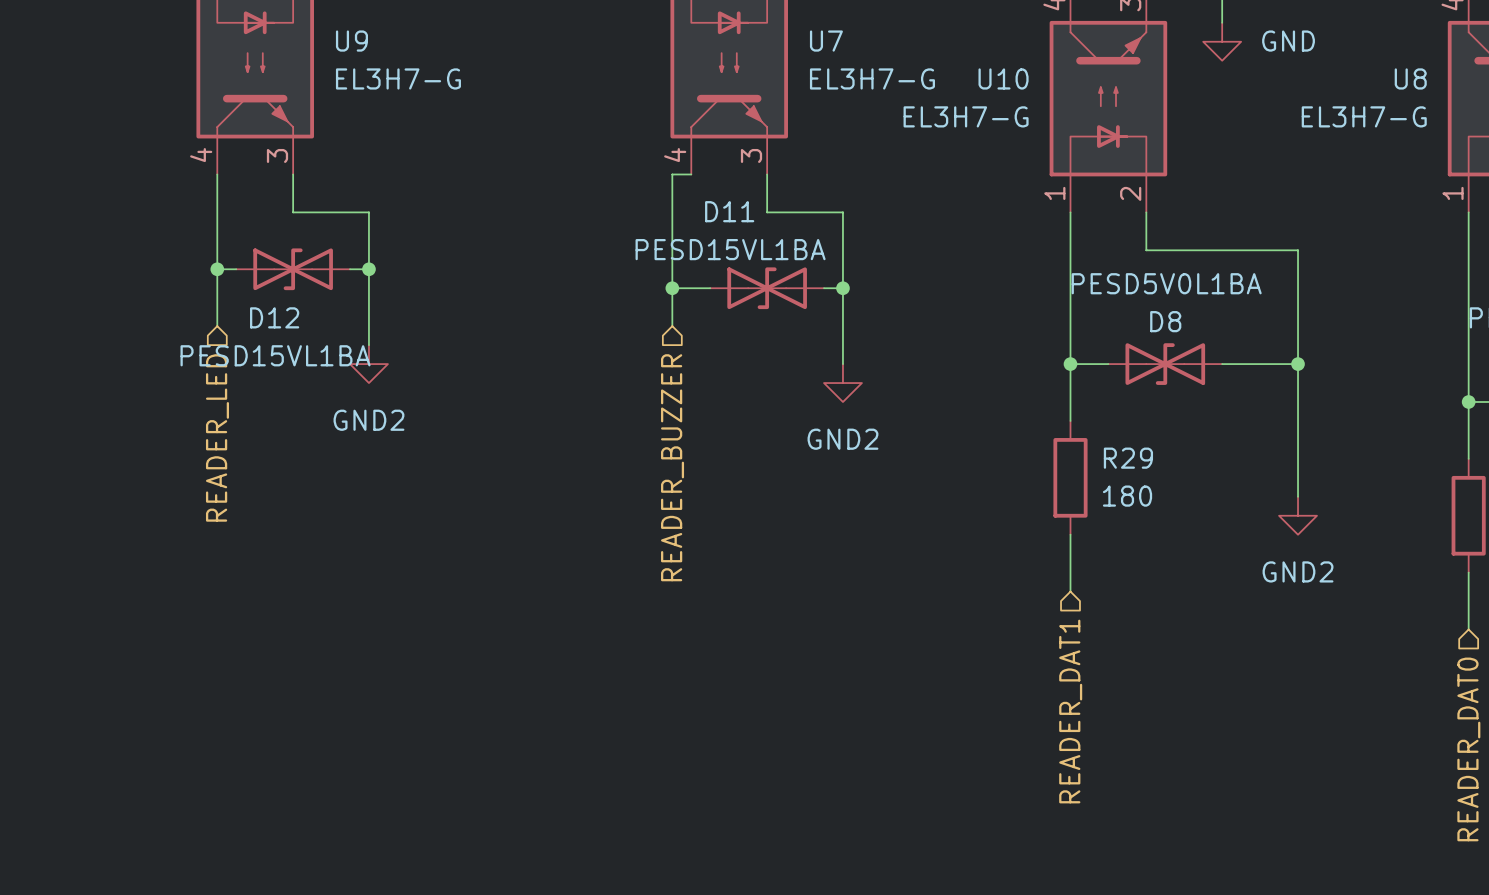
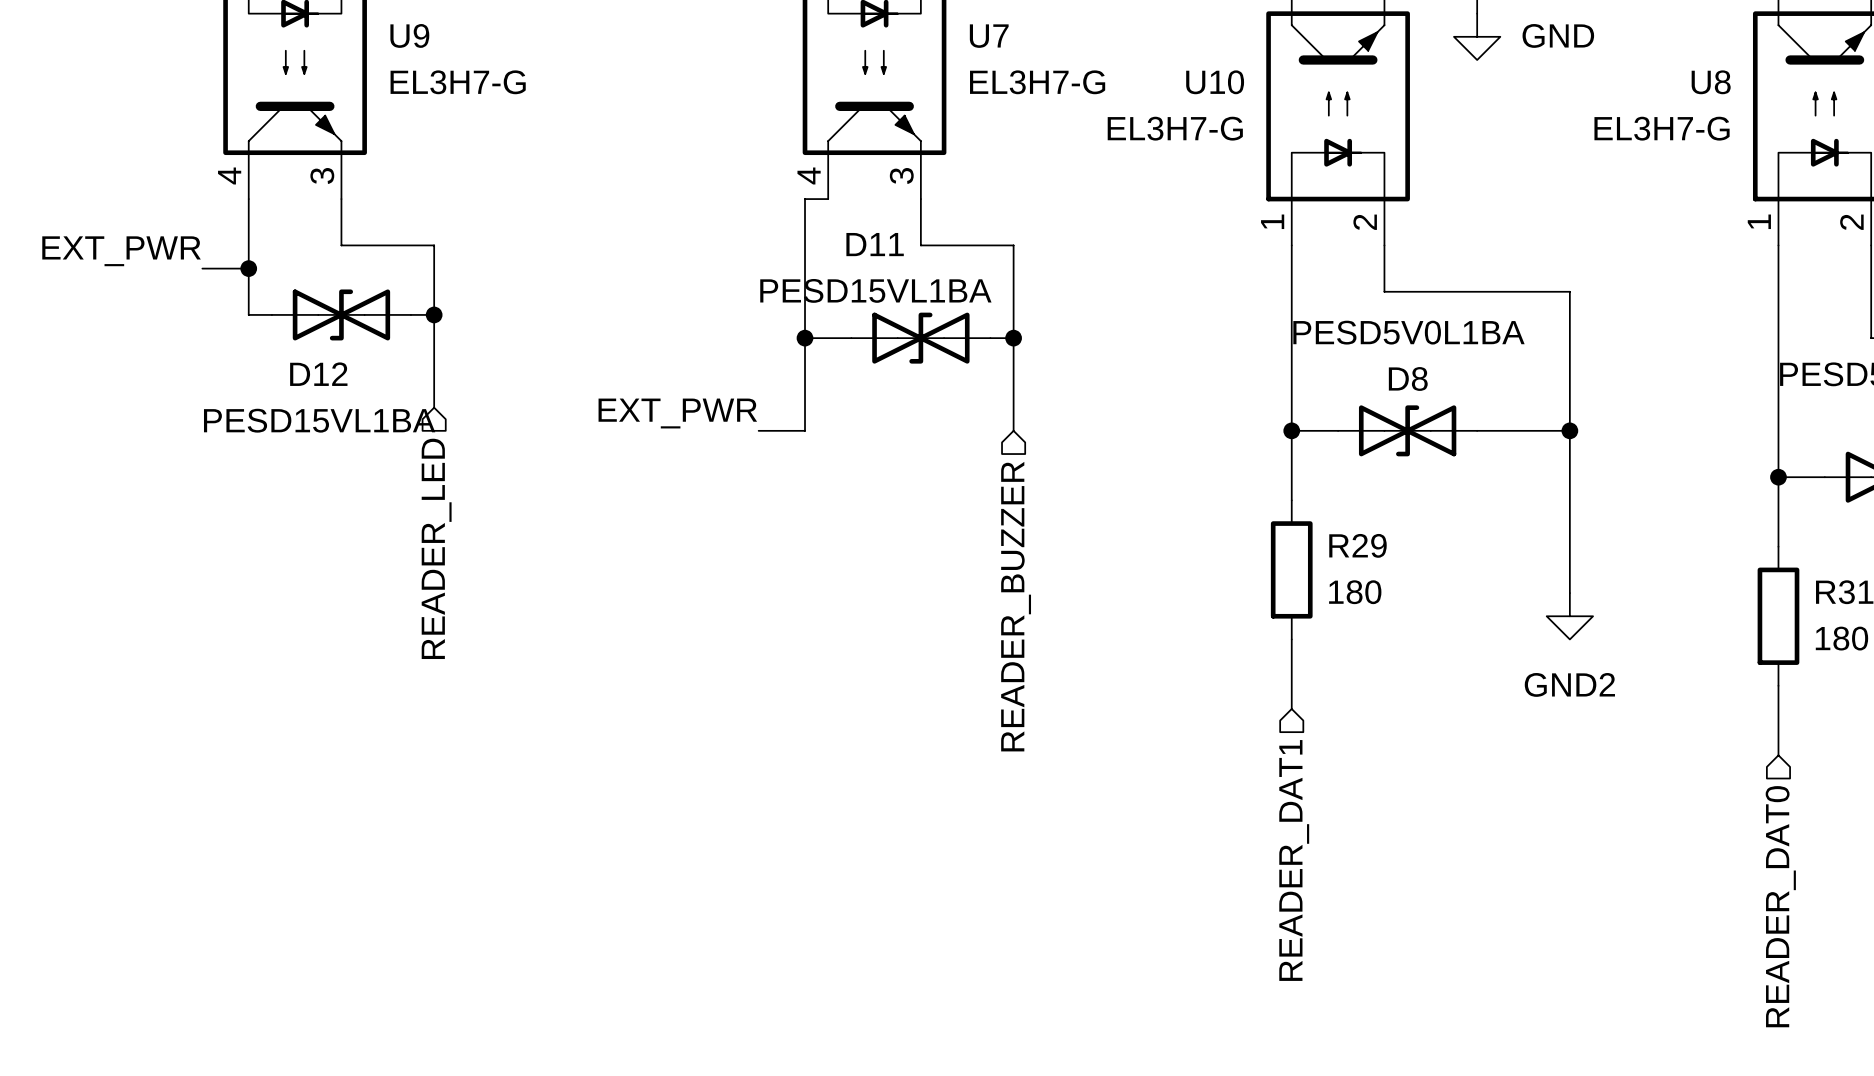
label: none -> EXT_PWR (121, 251)
wire: none -> (202, 268) (248, 268)
wire: (217, 269) (217, 326) -> none
junction position: (217, 269) -> (248, 268)
wire: none -> (805, 384) (805, 430) (758, 430)
label: none -> EXT_PWR (677, 413)
power symbol: GND2 (368, 364) -> none
power symbol: GND2 (842, 383) -> none
hierarchical label position: READER_LED (217, 437) -> READER_LED (436, 548)
hierarchical label position: READER_BUZZER (672, 467) -> READER_BUZZER (1016, 606)

